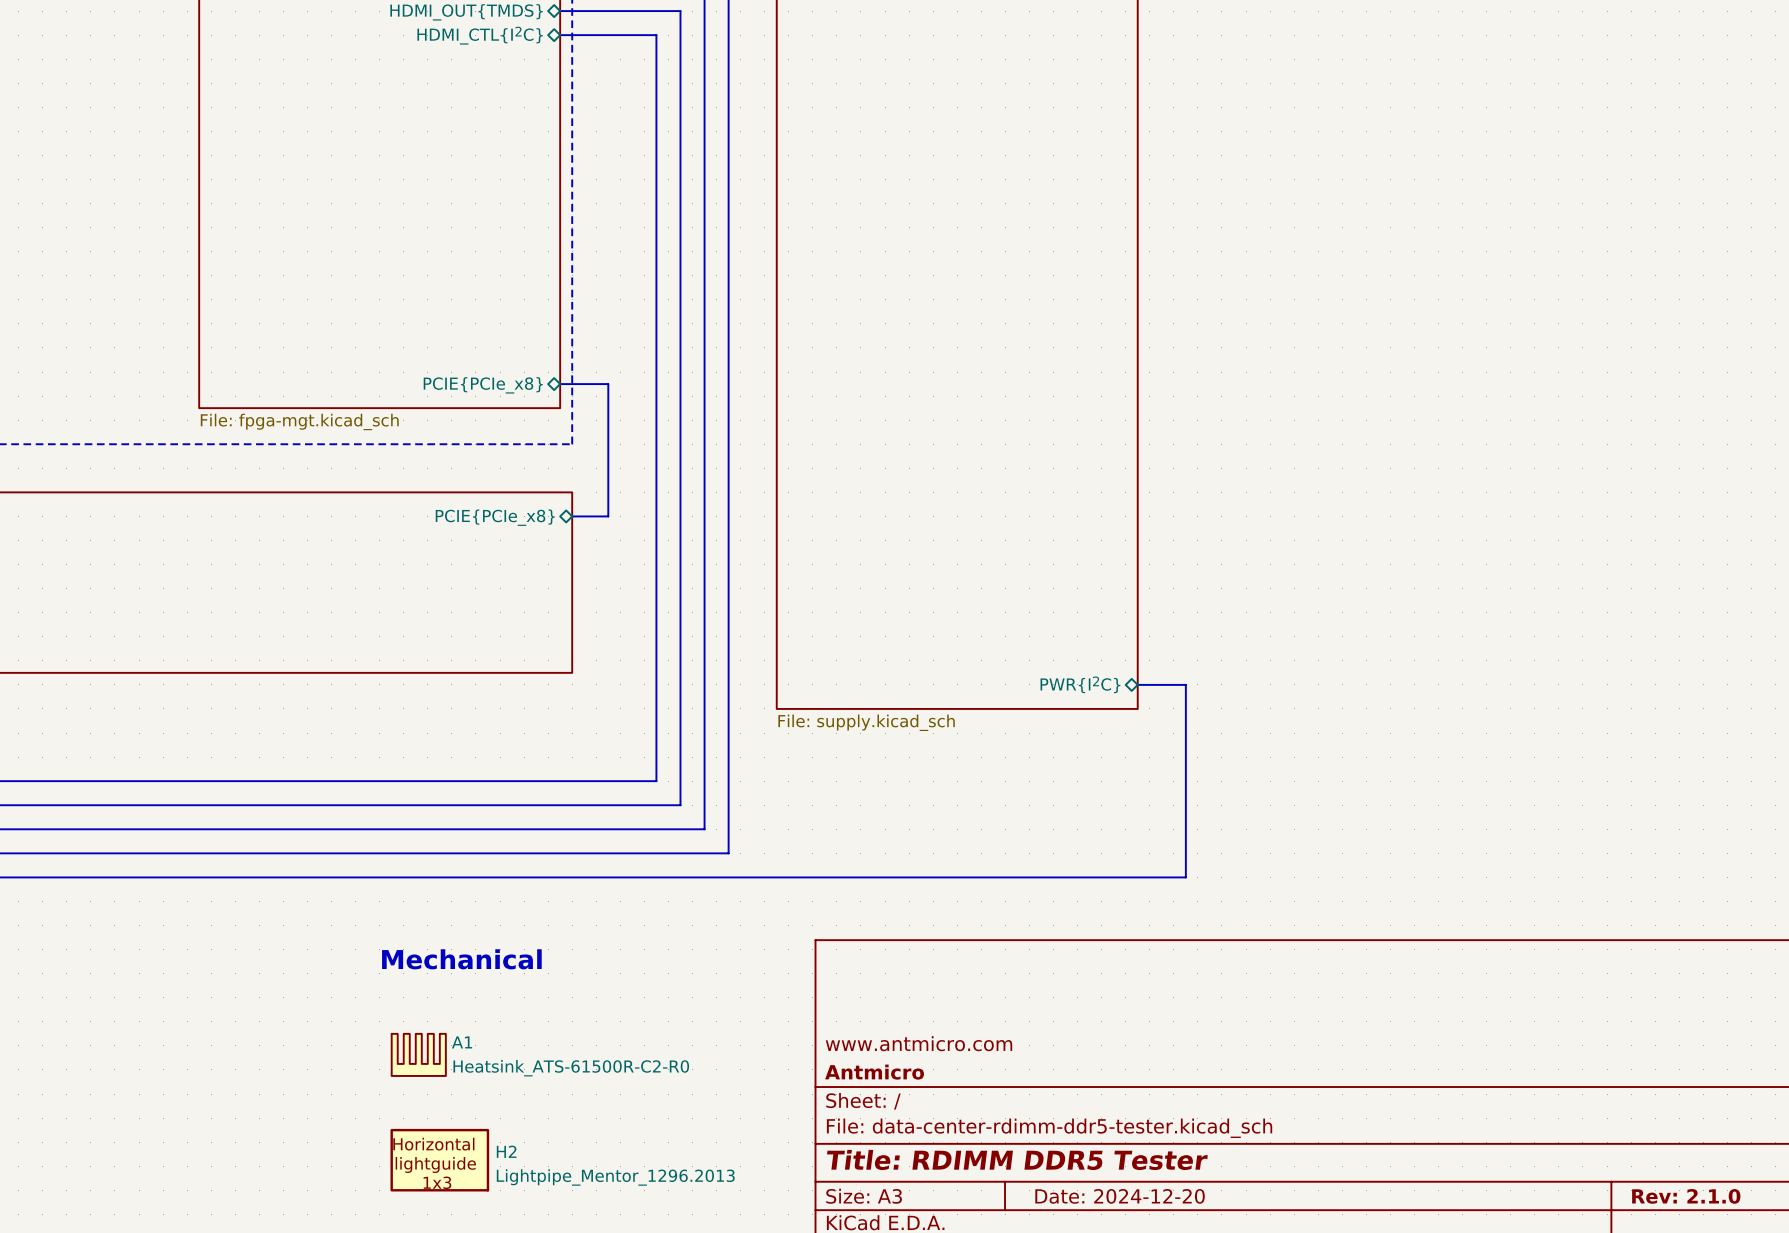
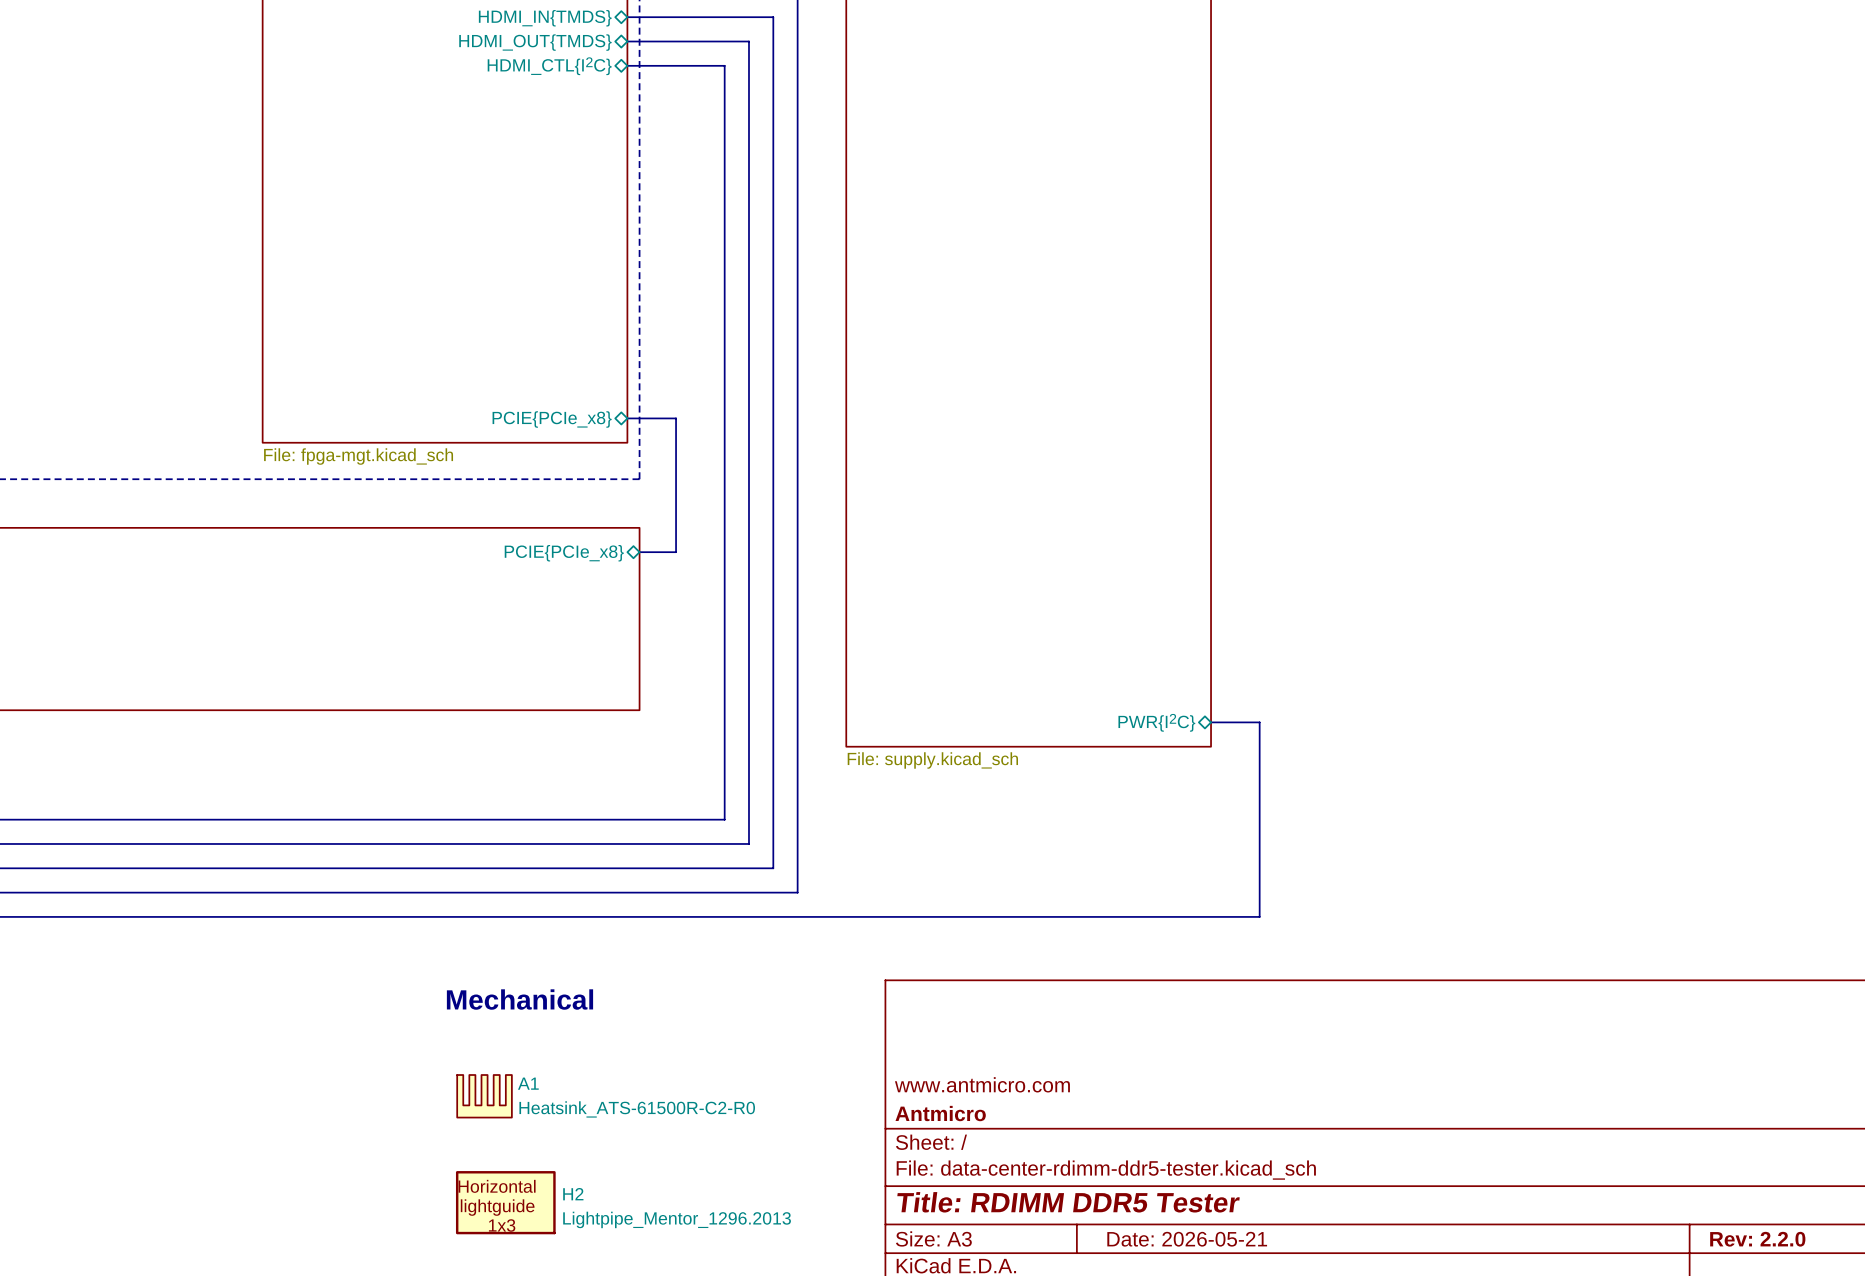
title block: Date: 2024-12-20 (1120, 1196) -> Date: 2026-05-21 (1187, 1239)
title block: Rev: 2.1.0 (1686, 1196) -> Rev: 2.2.0 (1757, 1239)

